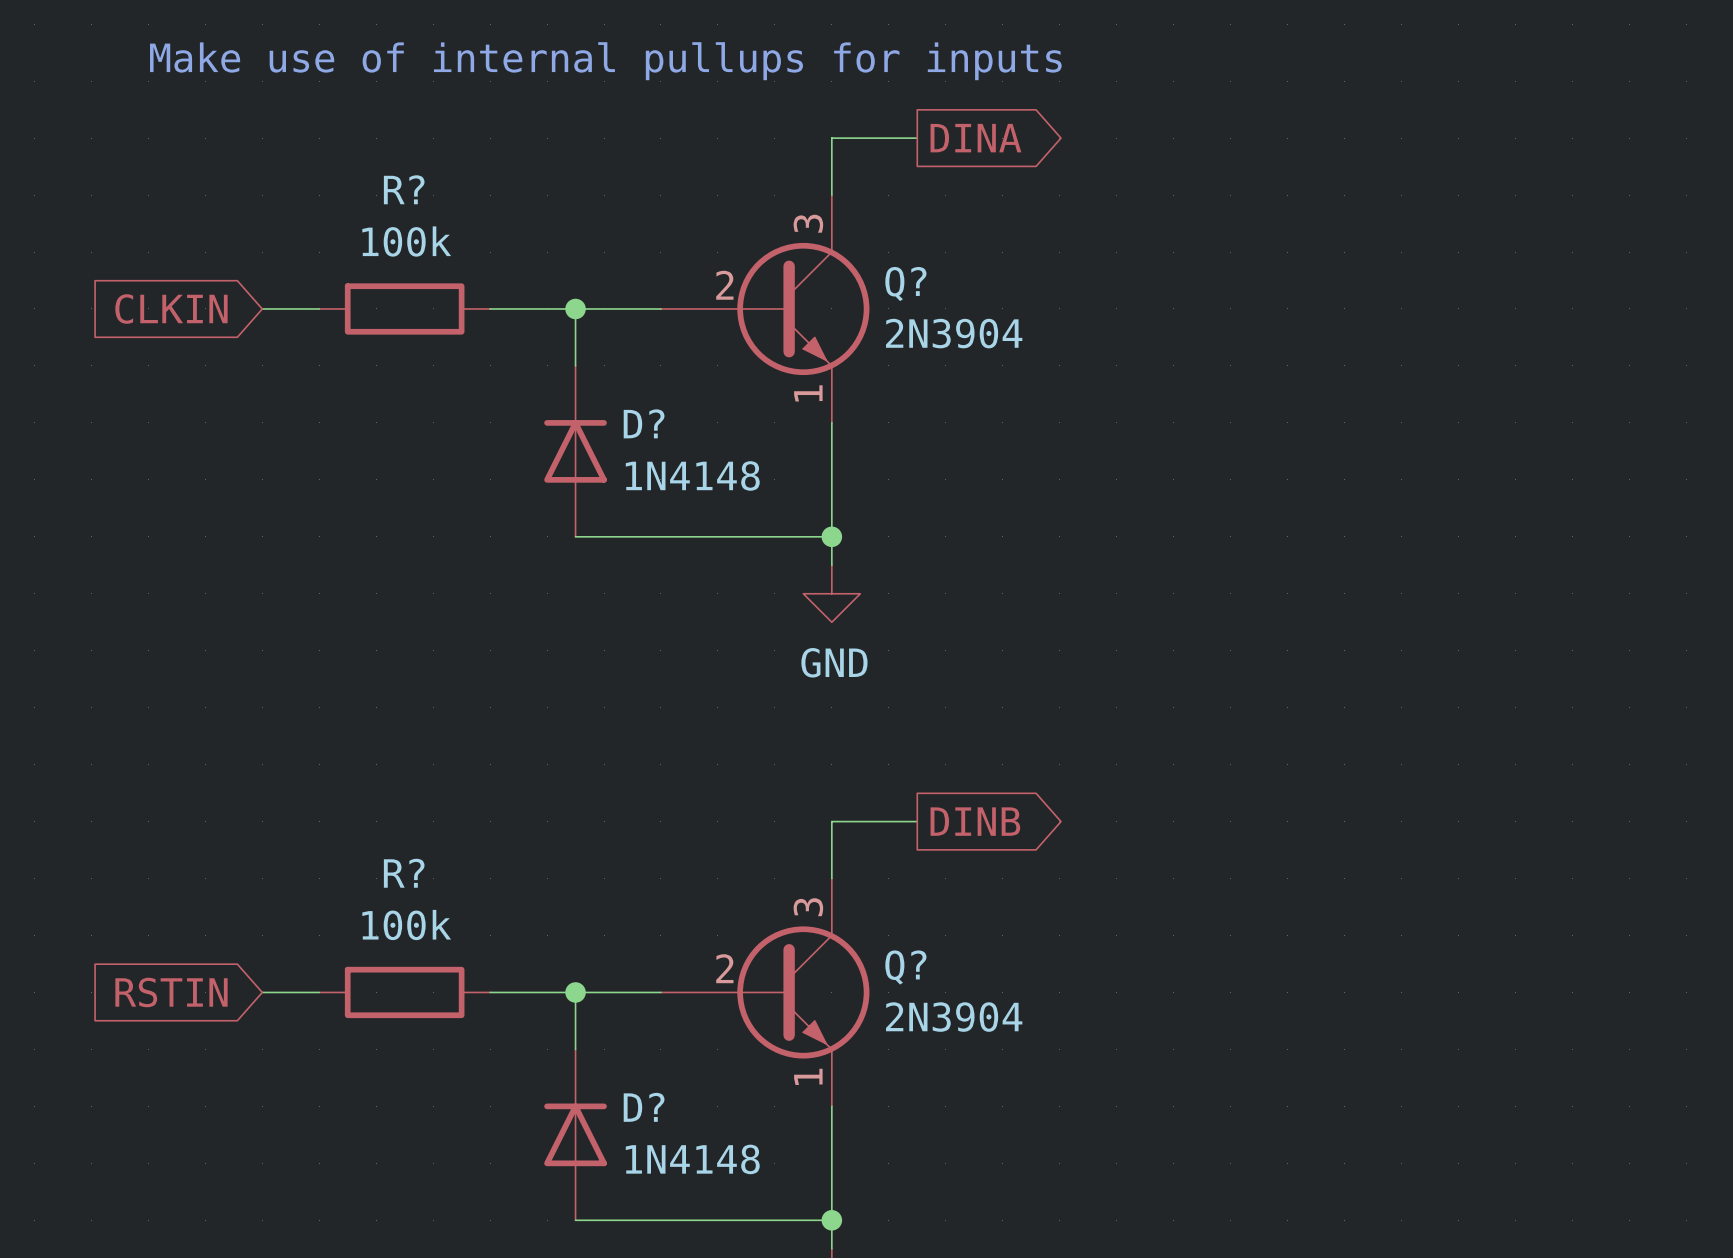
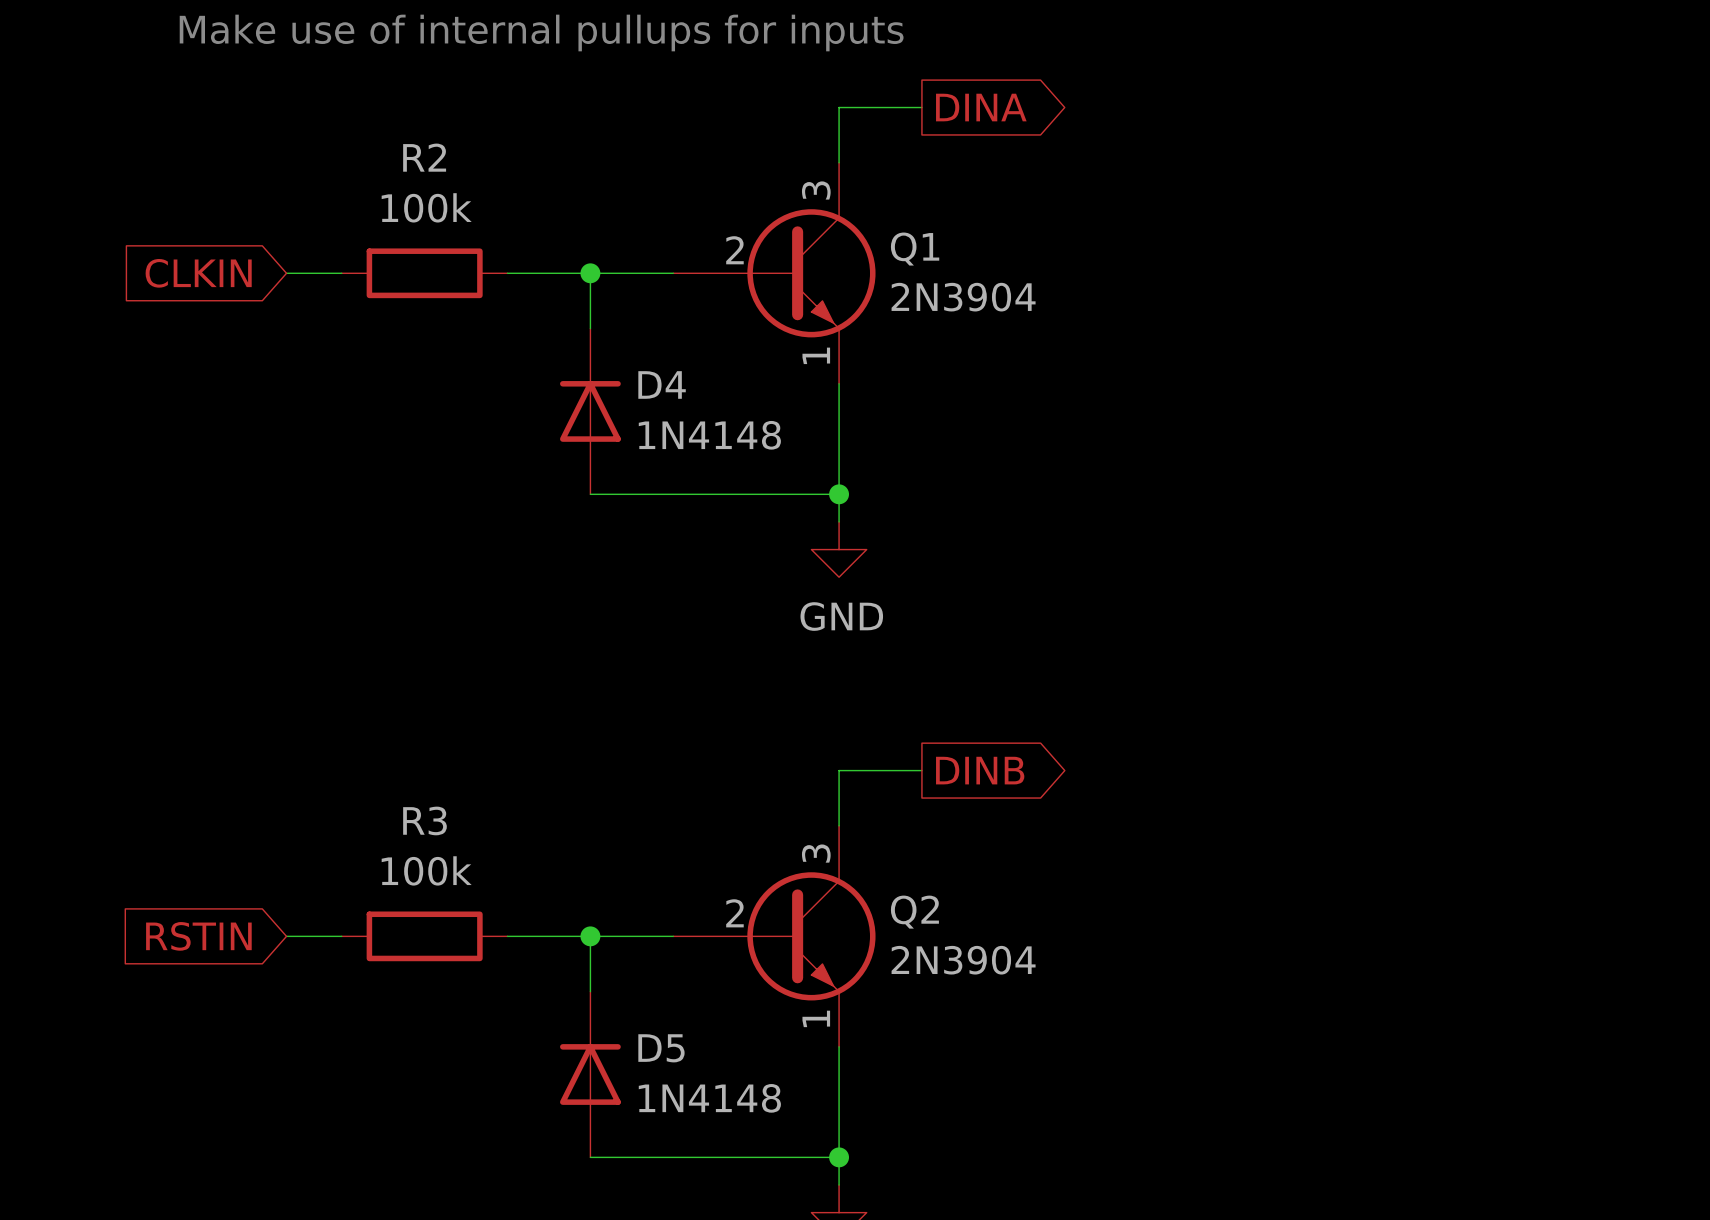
R? name: R? (404, 189) -> R2 (424, 157)
Q? name: Q? (905, 284) -> Q1 (915, 249)
D? name: D? (644, 423) -> D4 (662, 384)
R? name: R? (404, 873) -> R3 (424, 820)
Q? name: Q? (905, 967) -> Q2 (914, 912)
D? name: D? (644, 1107) -> D5 (661, 1048)

